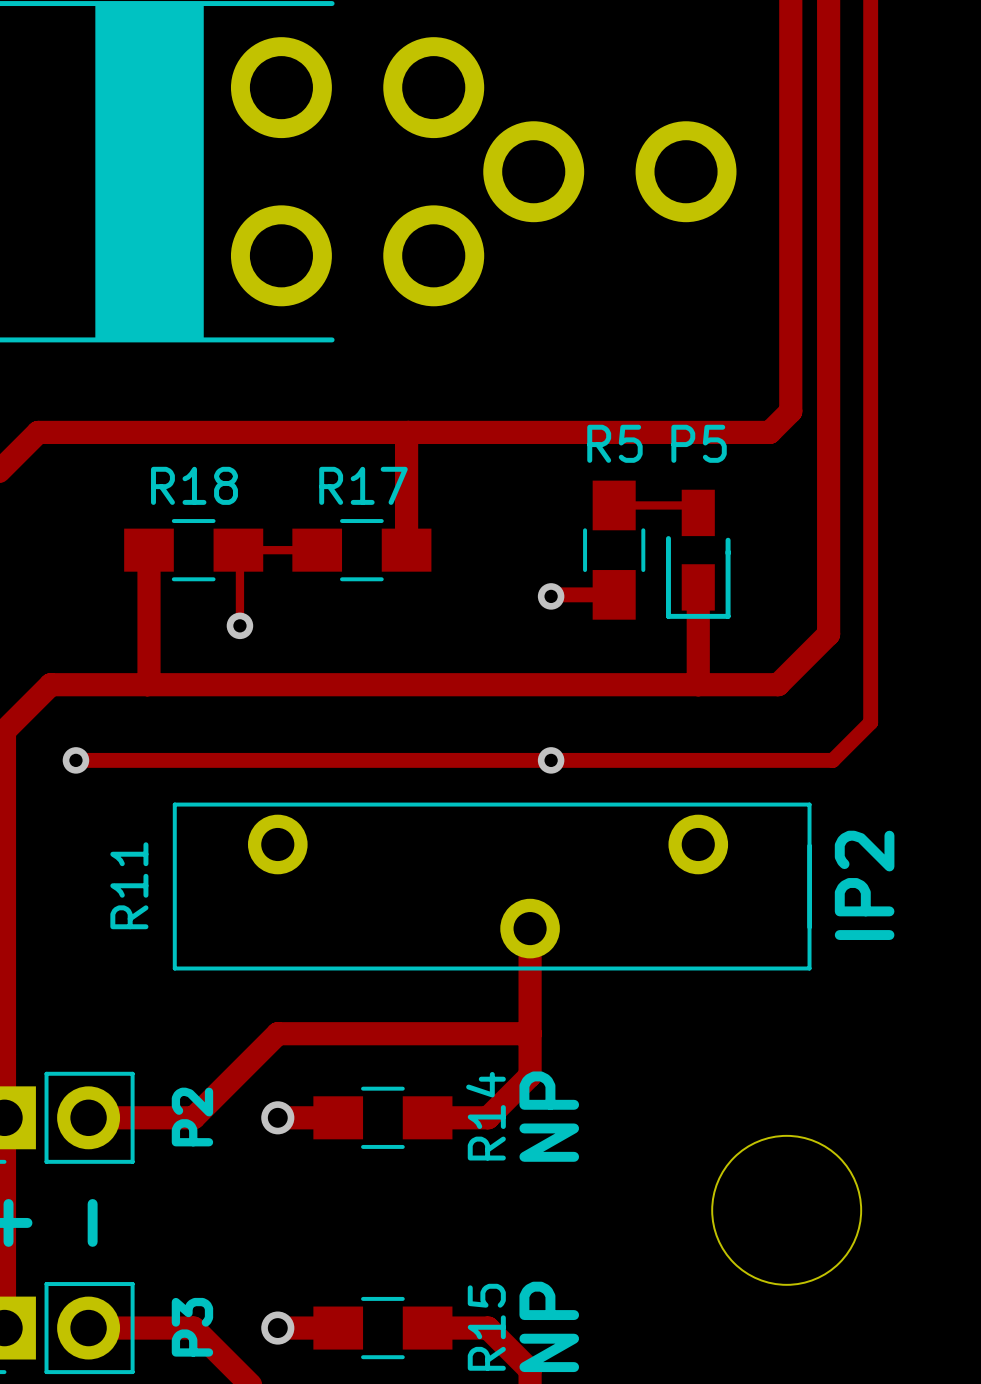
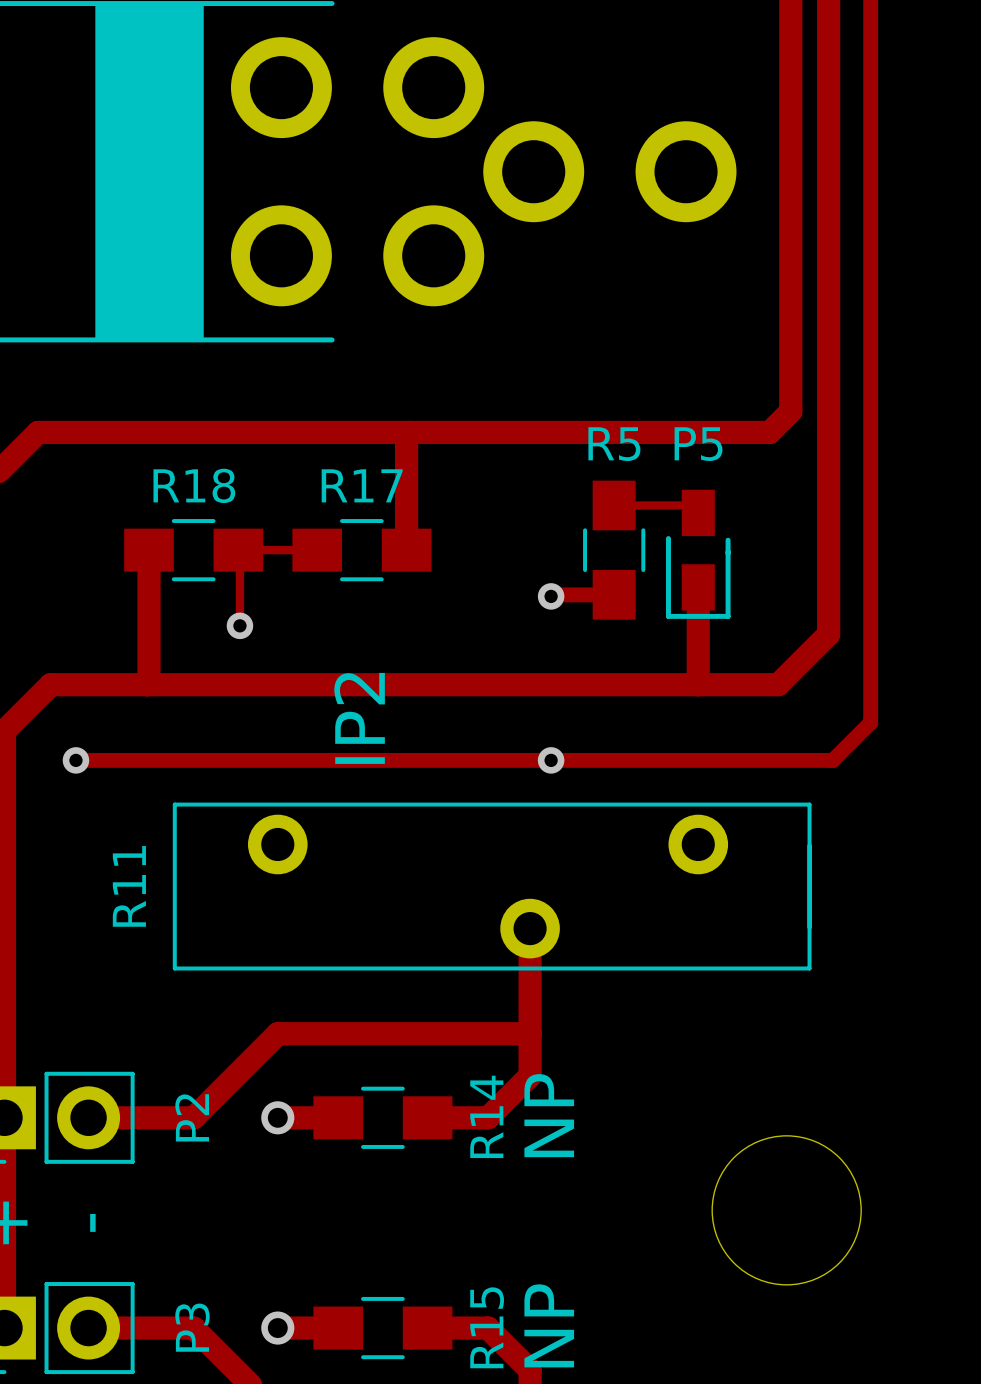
text position: IP2 (864, 885) -> IP2 (359, 718)

